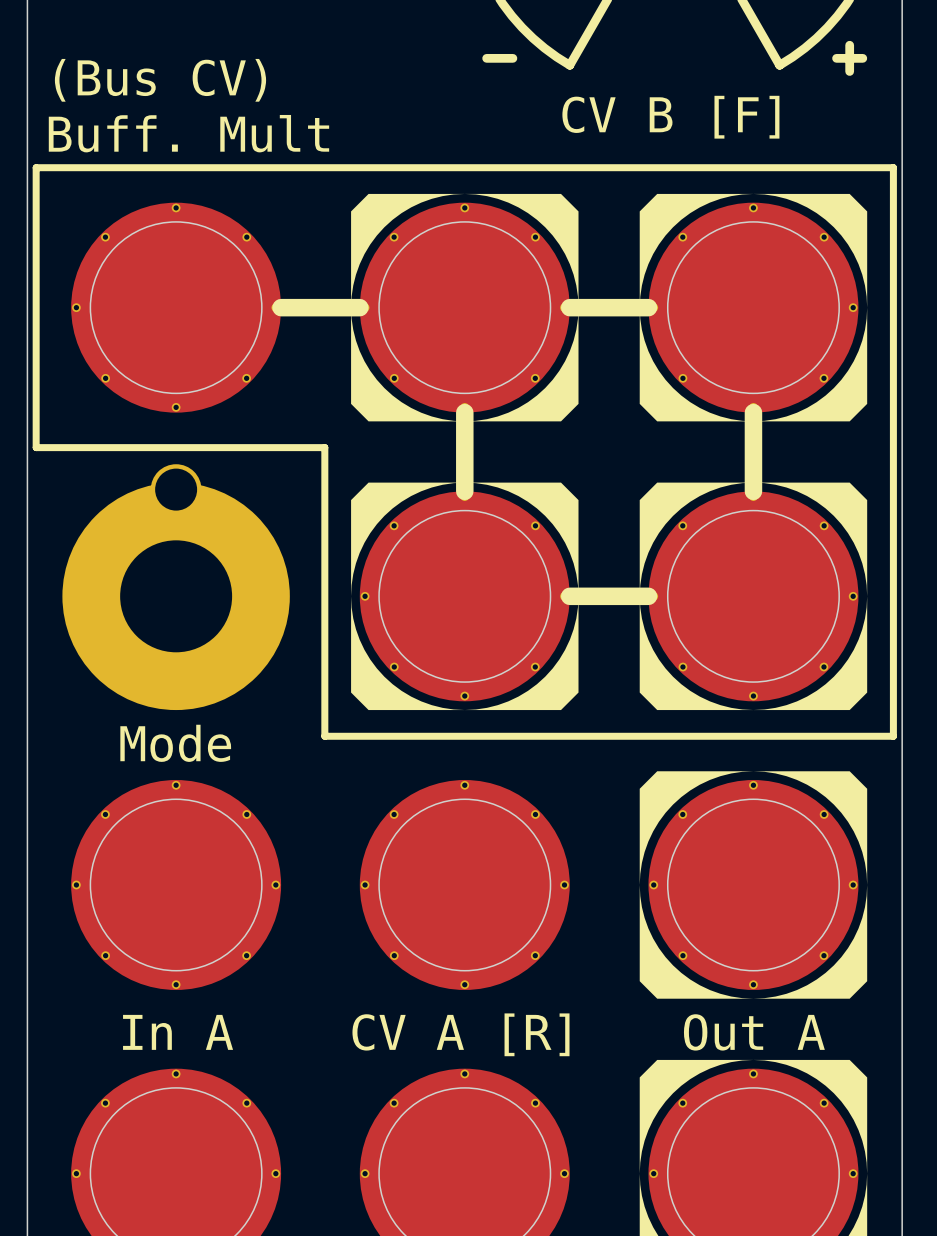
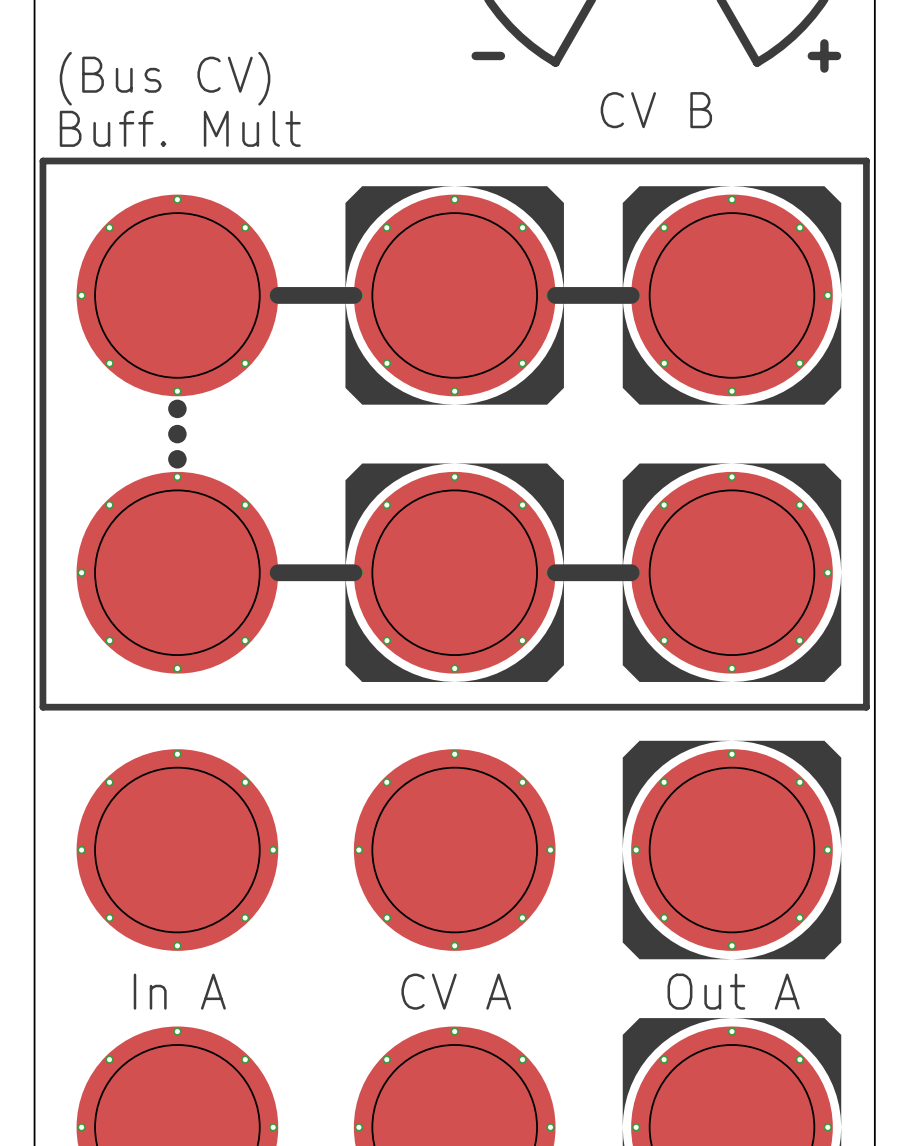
part value: CV B [F] (670, 117) -> CV B (656, 110)
line: (464, 412) (464, 491) -> none
line: (753, 412) (753, 491) -> none
drawing: none -> [168, 399, 187, 469]
line: (36, 447) (324, 447) (324, 736) -> (42, 429) (42, 707) (320, 707)
part footprint: [62, 464, 290, 711] -> [76, 471, 279, 674]
line: none -> (278, 572) (353, 572)
part value: Mode (175, 743) -> none
part value: CV A [R] (460, 1034) -> CV A (456, 991)

